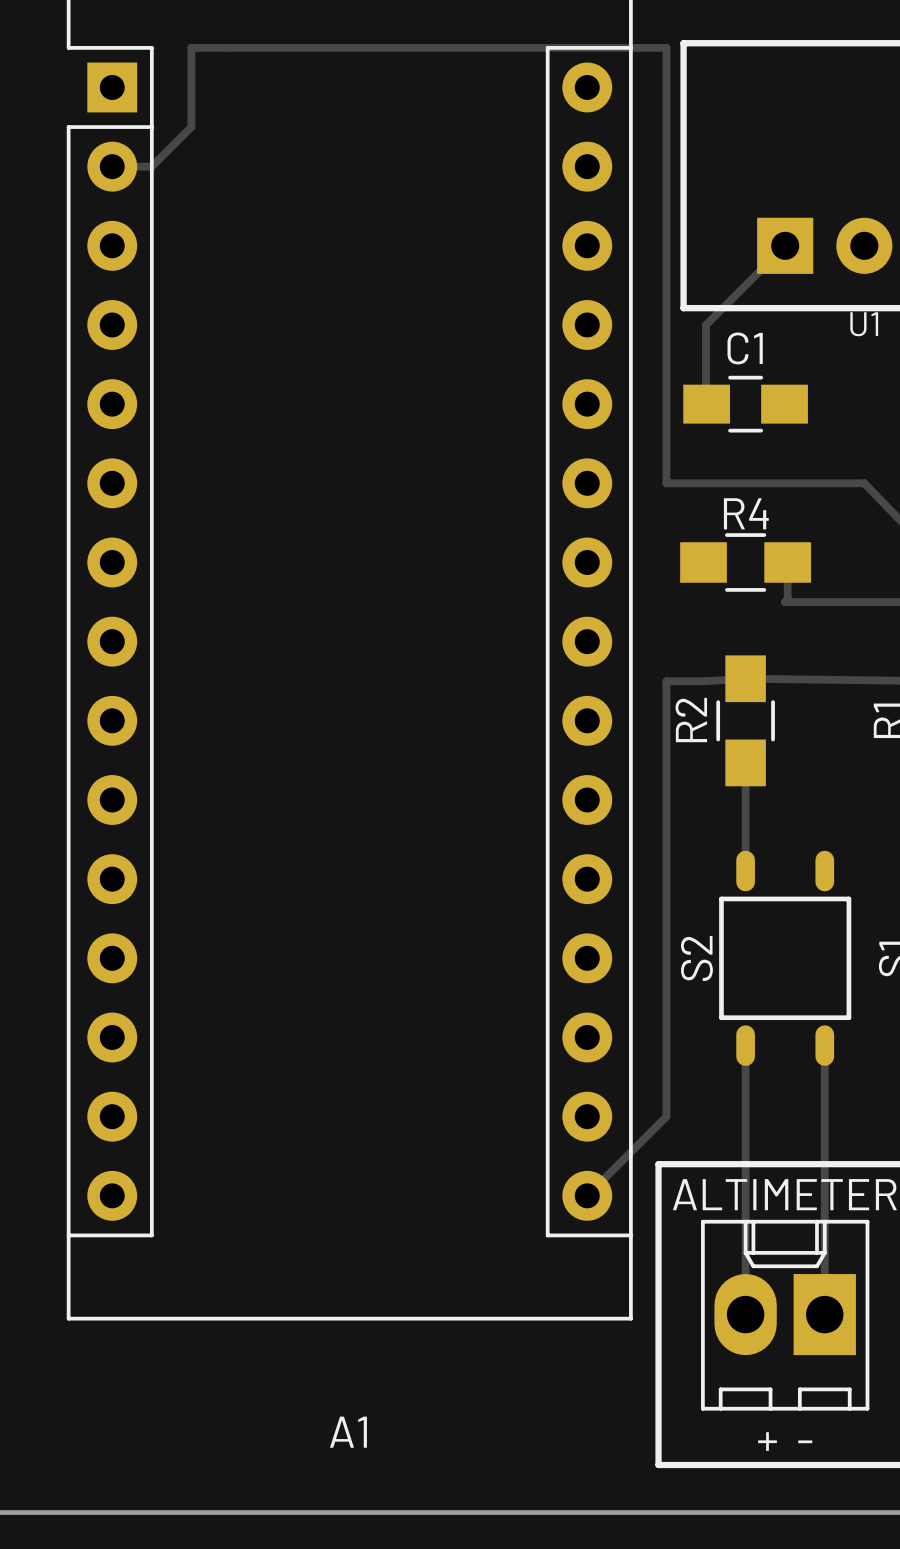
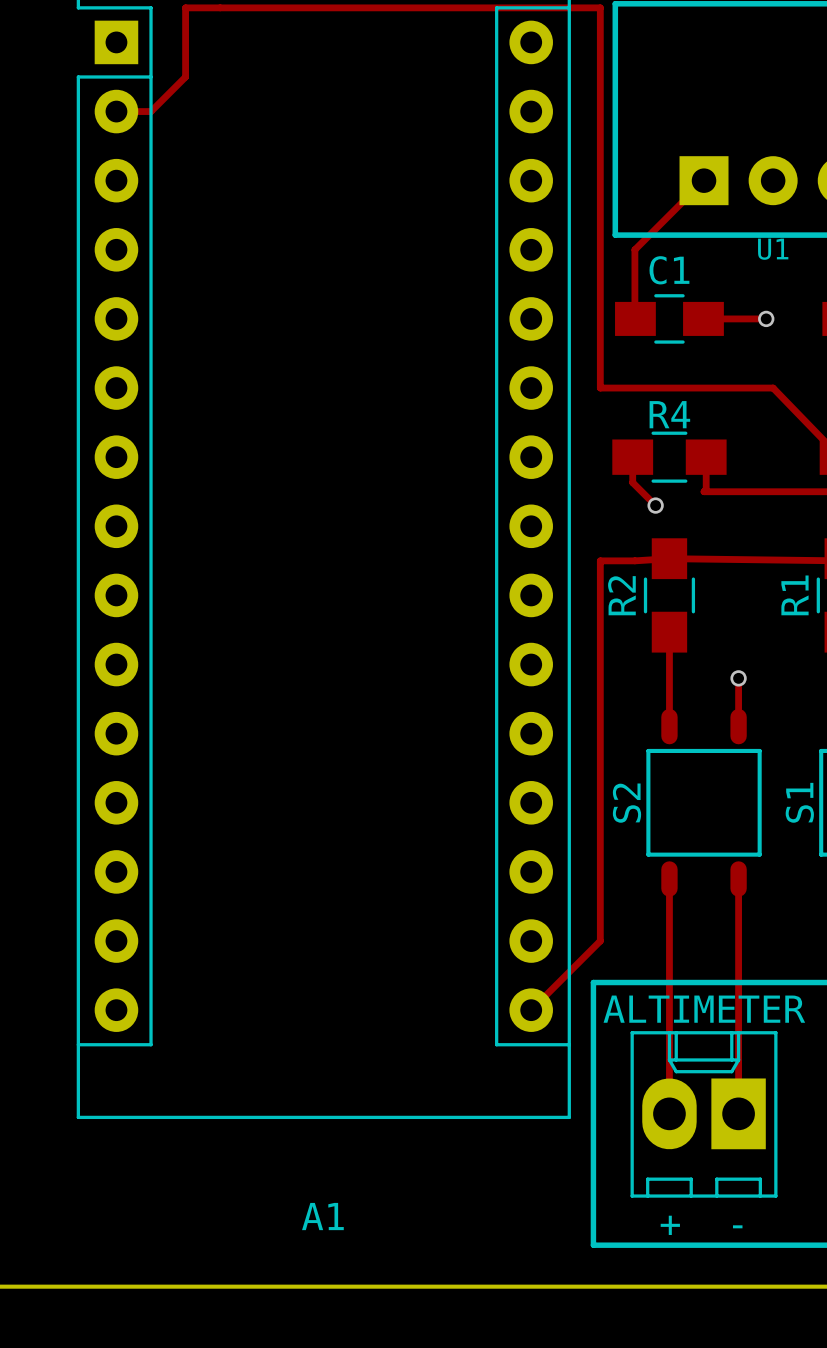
track: none -> (703, 318) (766, 318)
via: none -> (766, 318)
track: none -> (632, 457) (632, 482) (655, 505)
via: none -> (655, 505)
track: none -> (738, 678) (738, 726)
via: none -> (738, 678)

